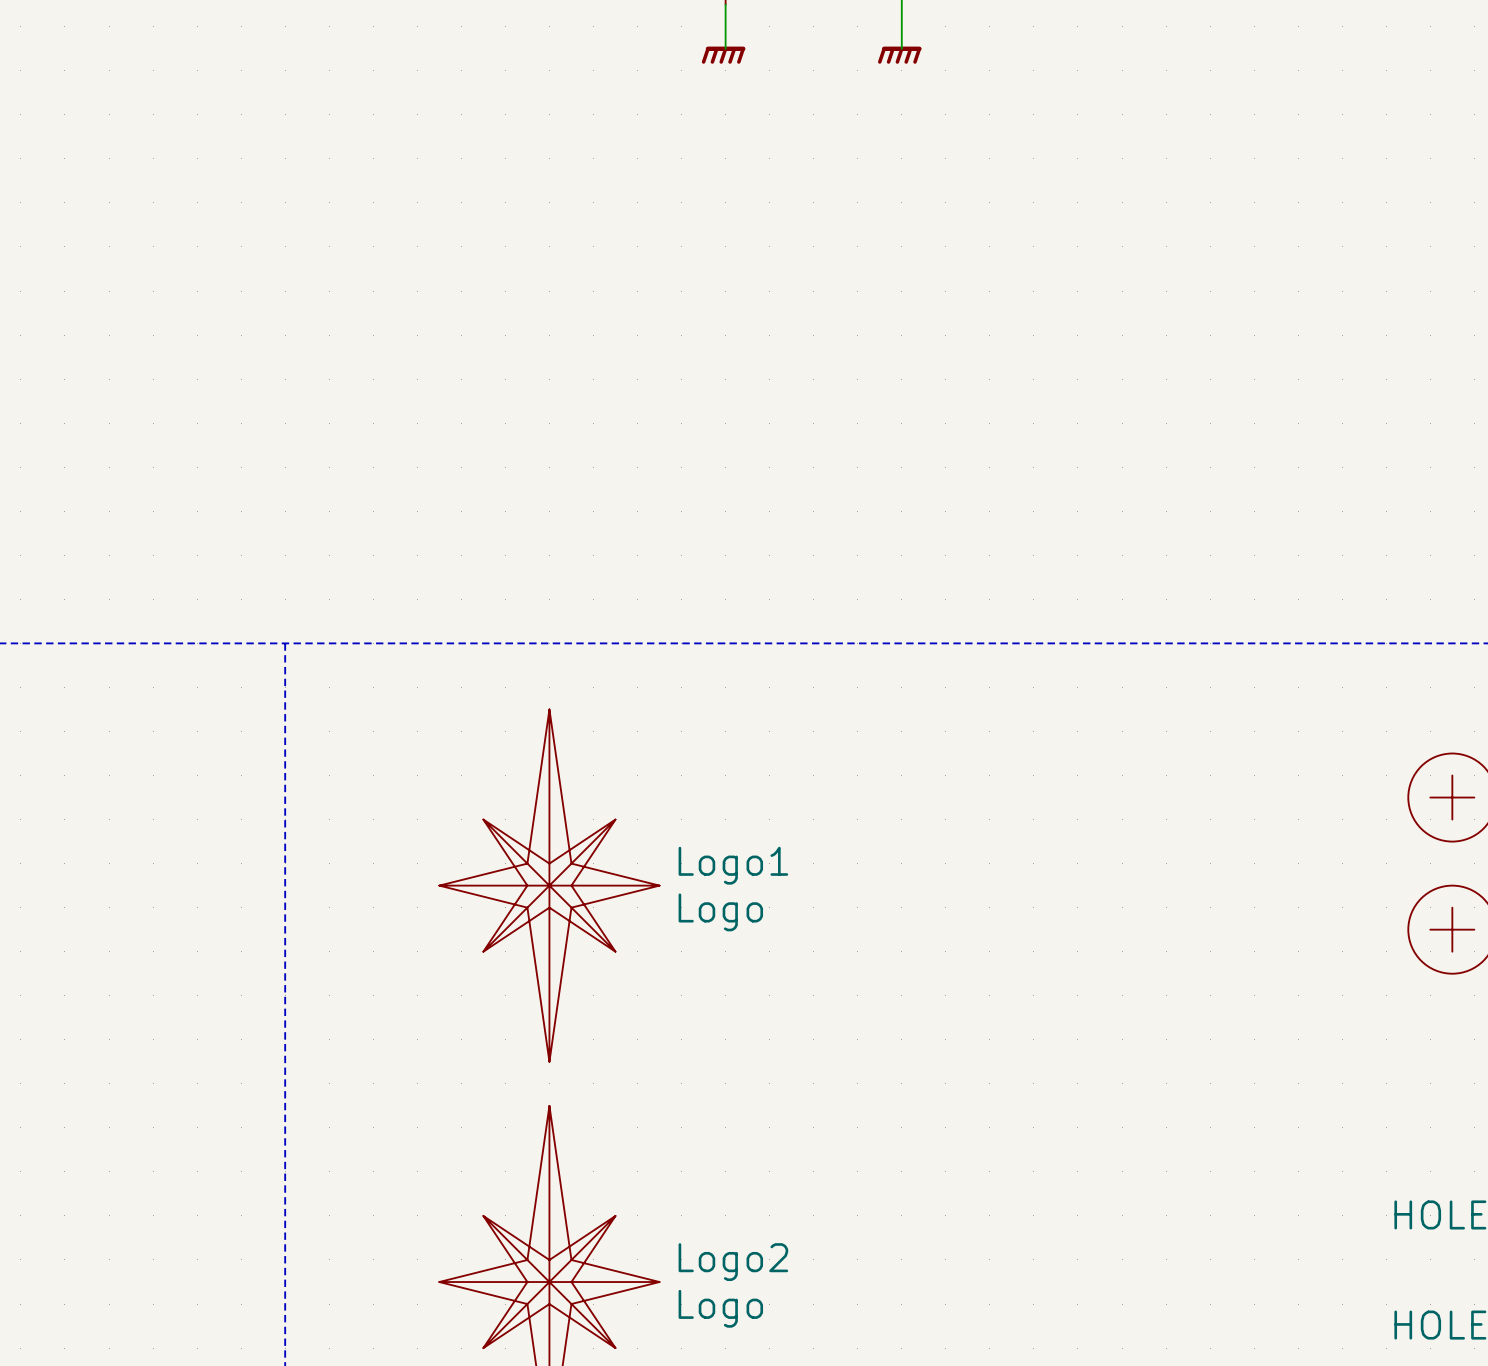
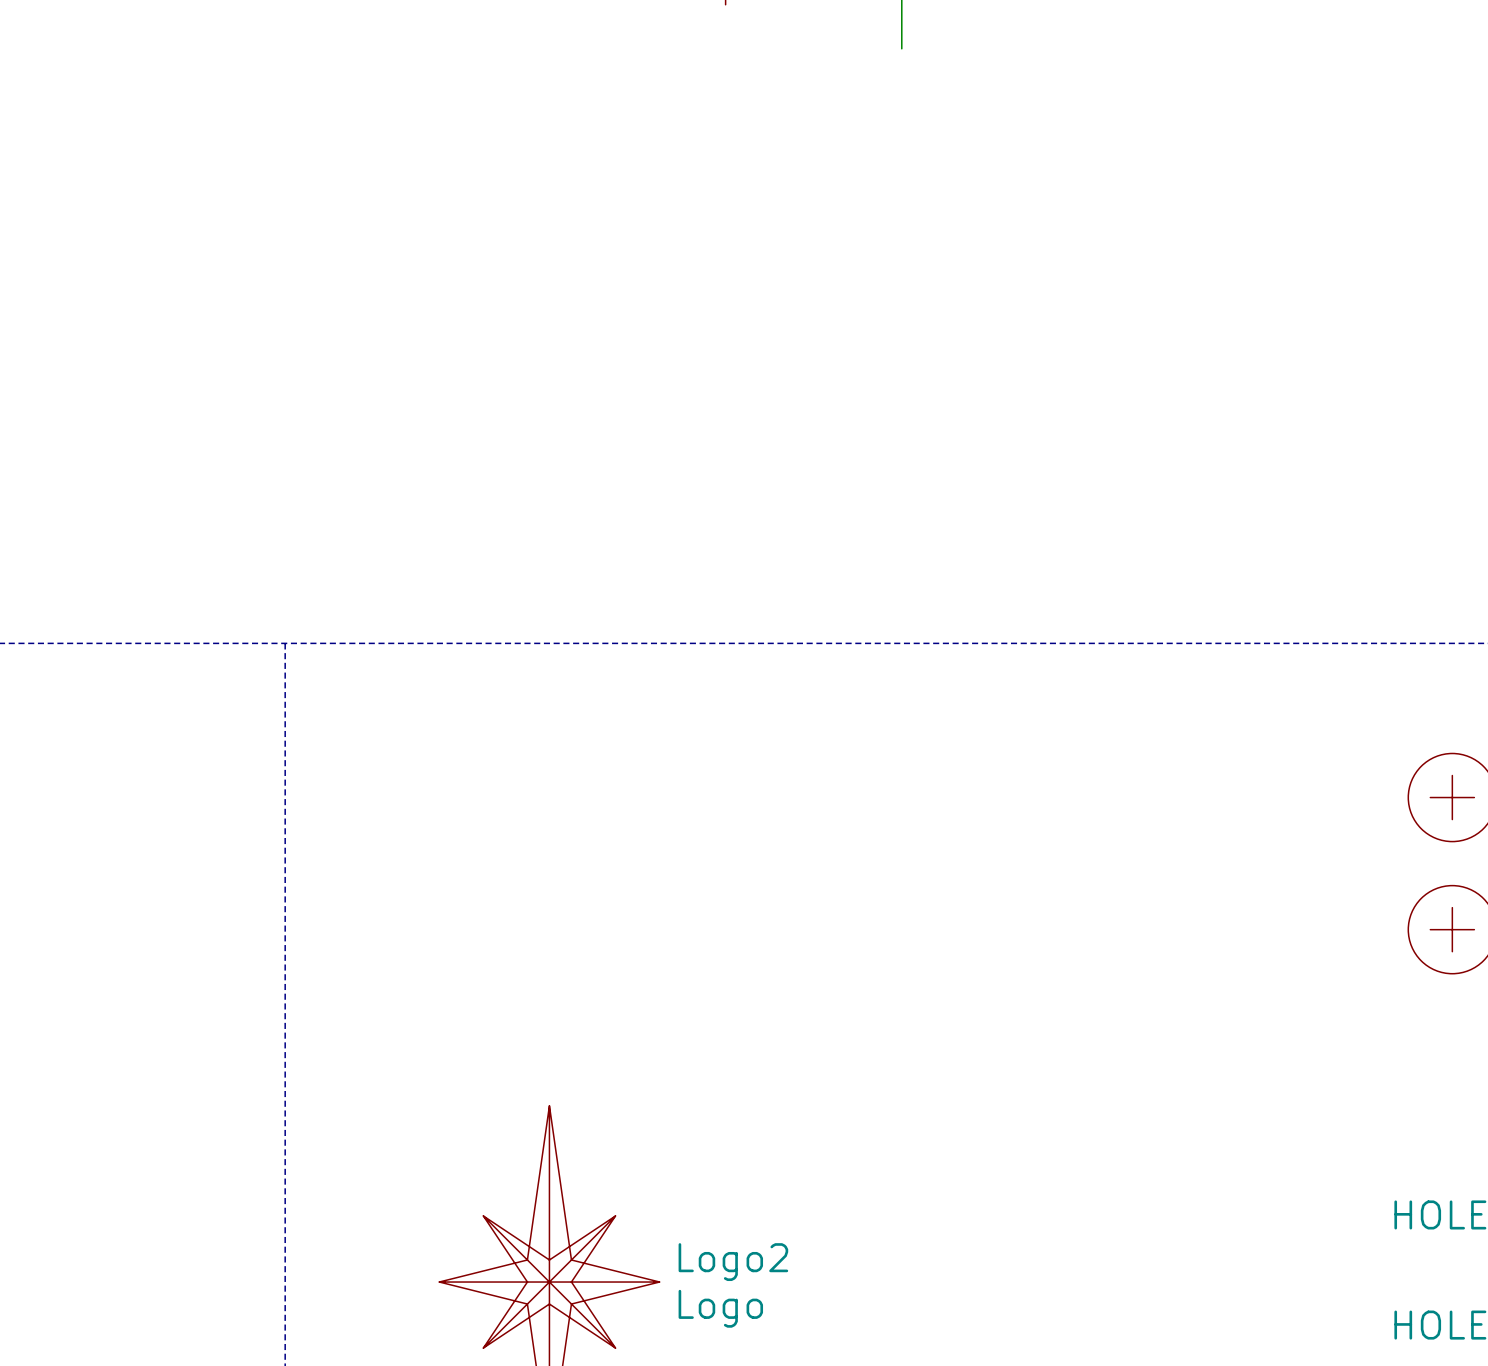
wire: (725, 4) (725, 48) -> none
power symbol: (723, 55) -> none
power symbol: (899, 55) -> none
Logo1: Logo (549, 885) -> none

